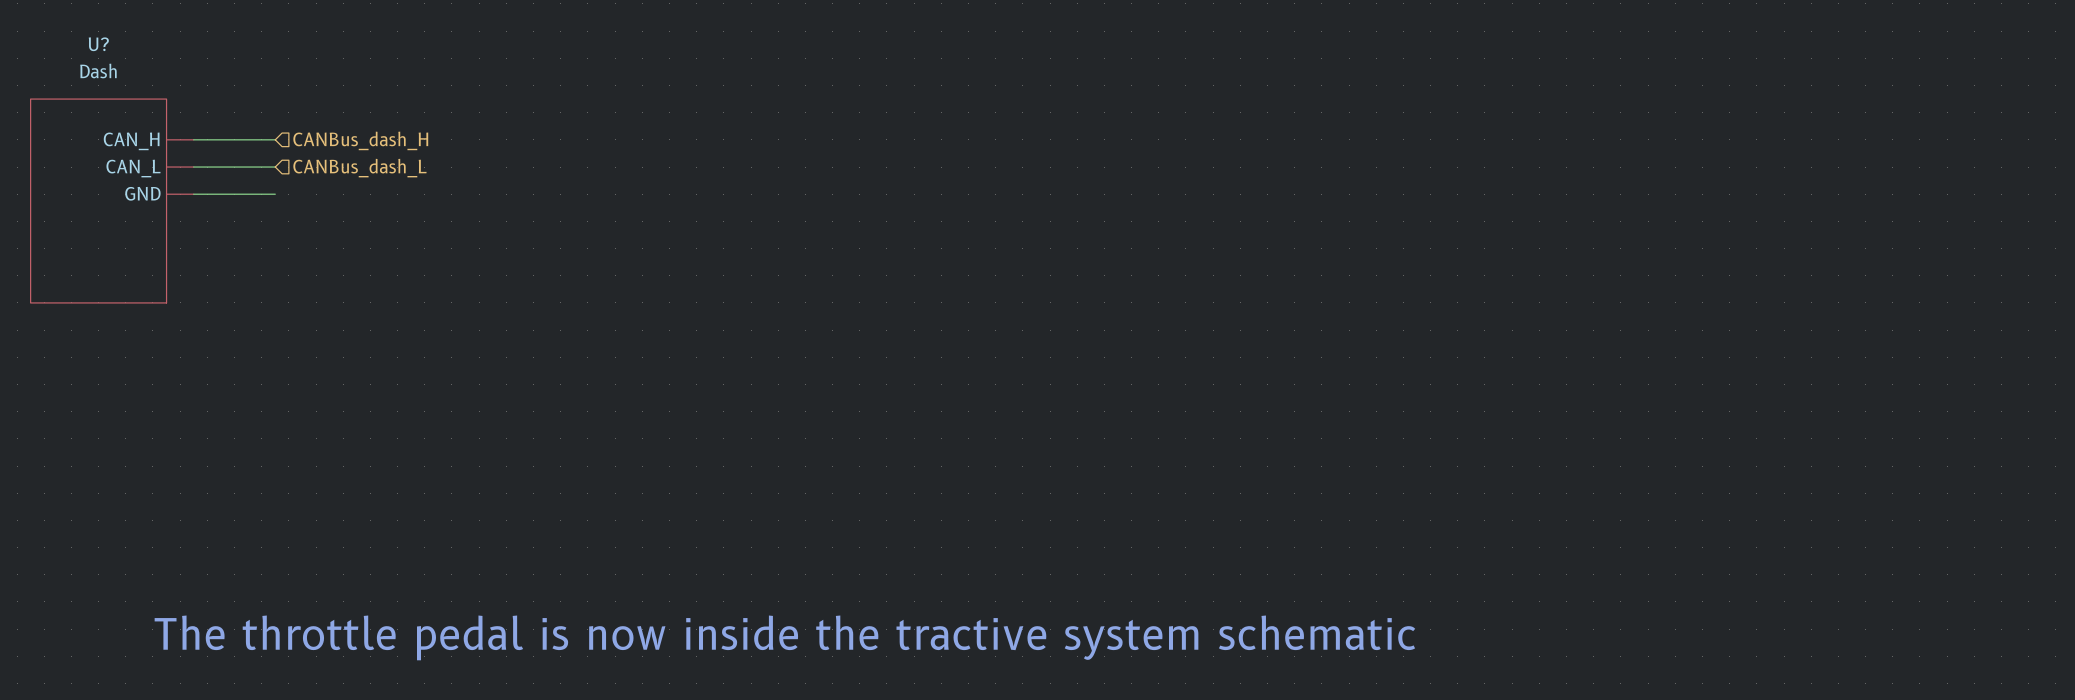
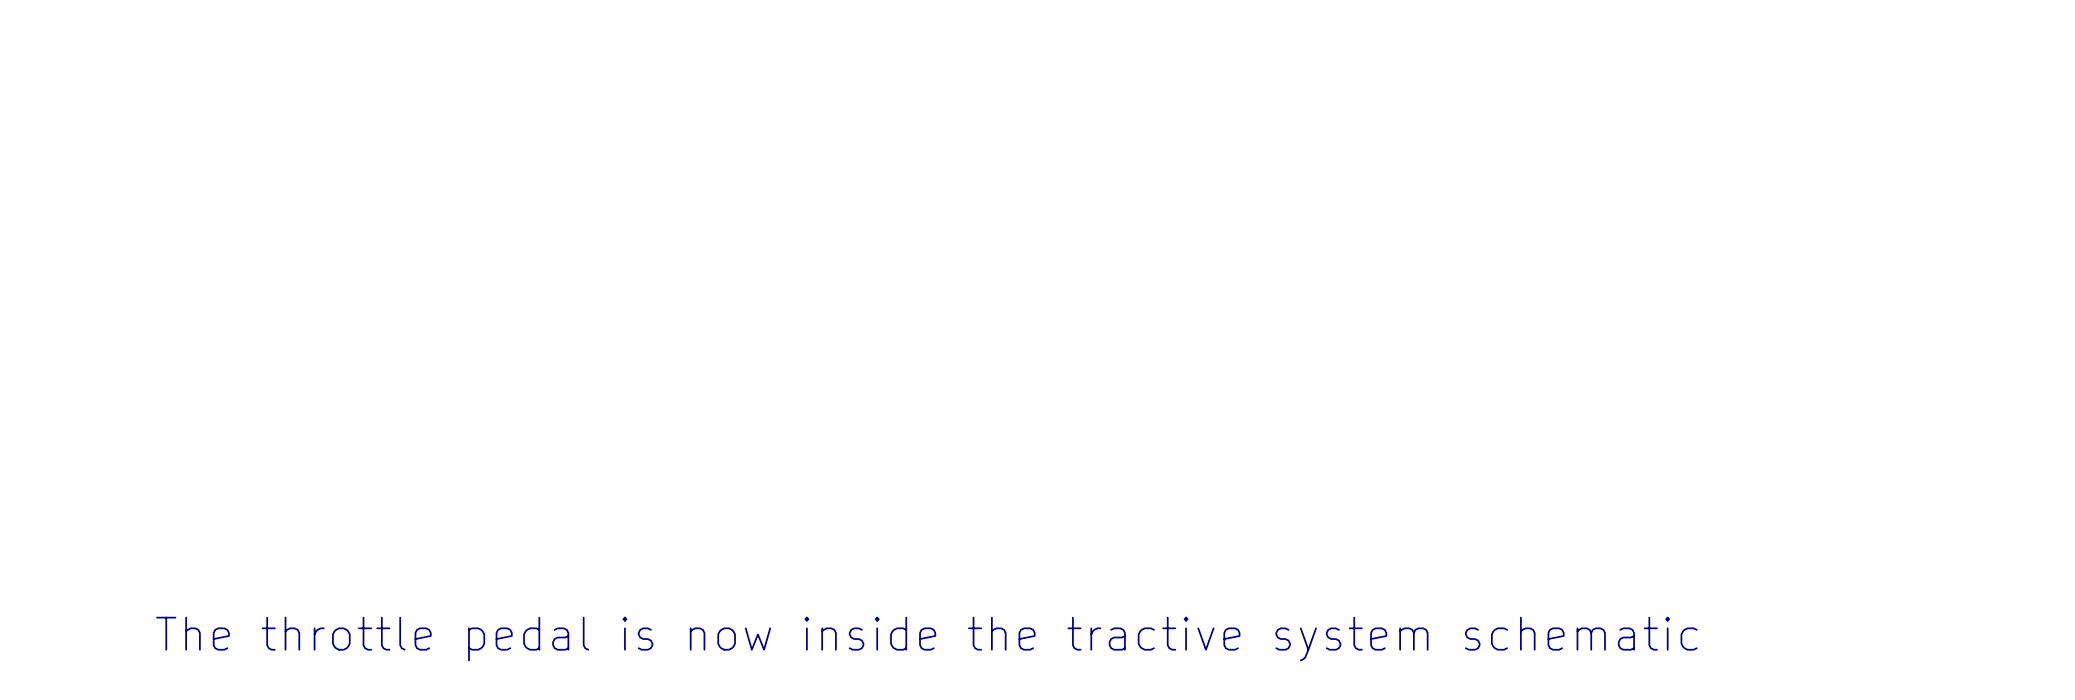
wire: (193, 139) (275, 139) -> none
hierarchical label: CANBus_dash_H (360, 140) -> none
wire: (193, 167) (275, 167) -> none
hierarchical label: CANBus_dash_L (359, 168) -> none
wire: (193, 194) (275, 194) -> none
U?: Dash (112, 201) -> none

